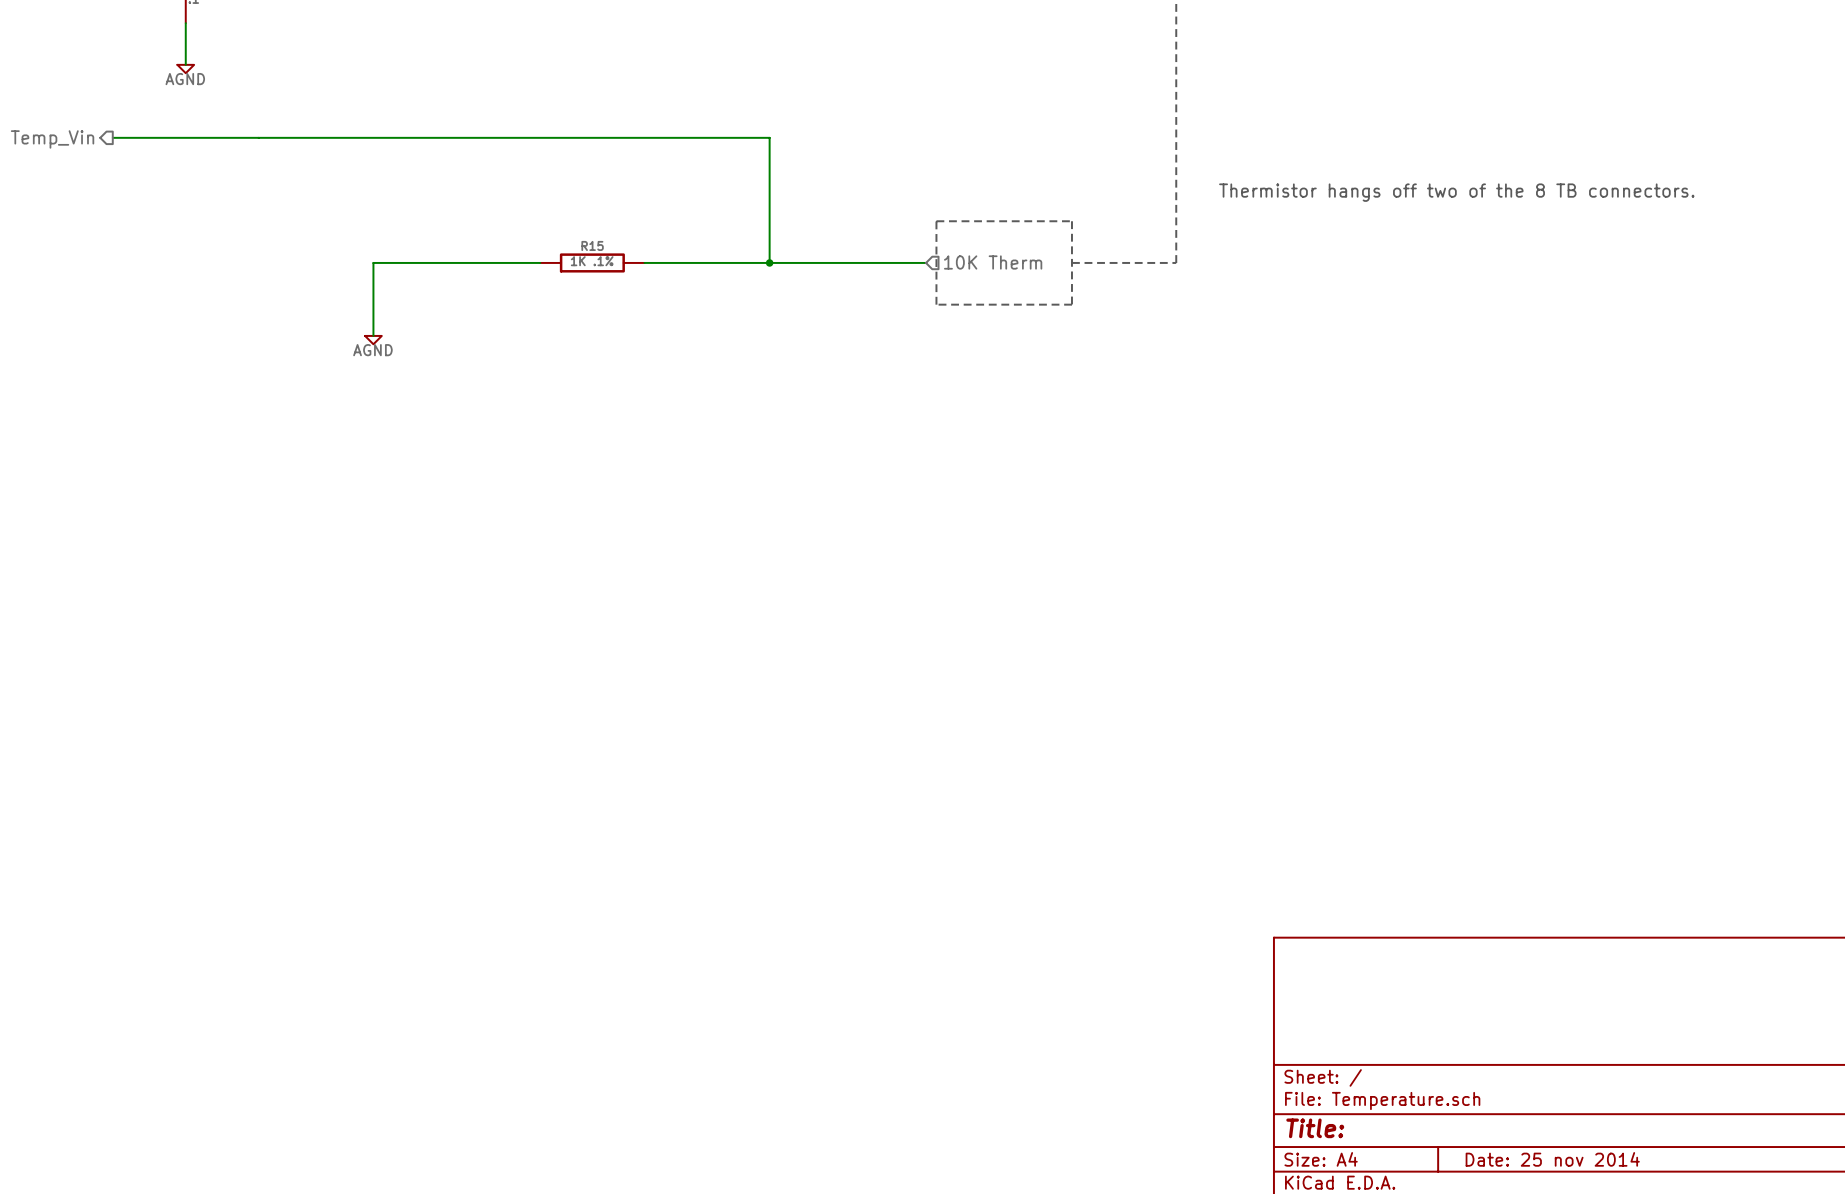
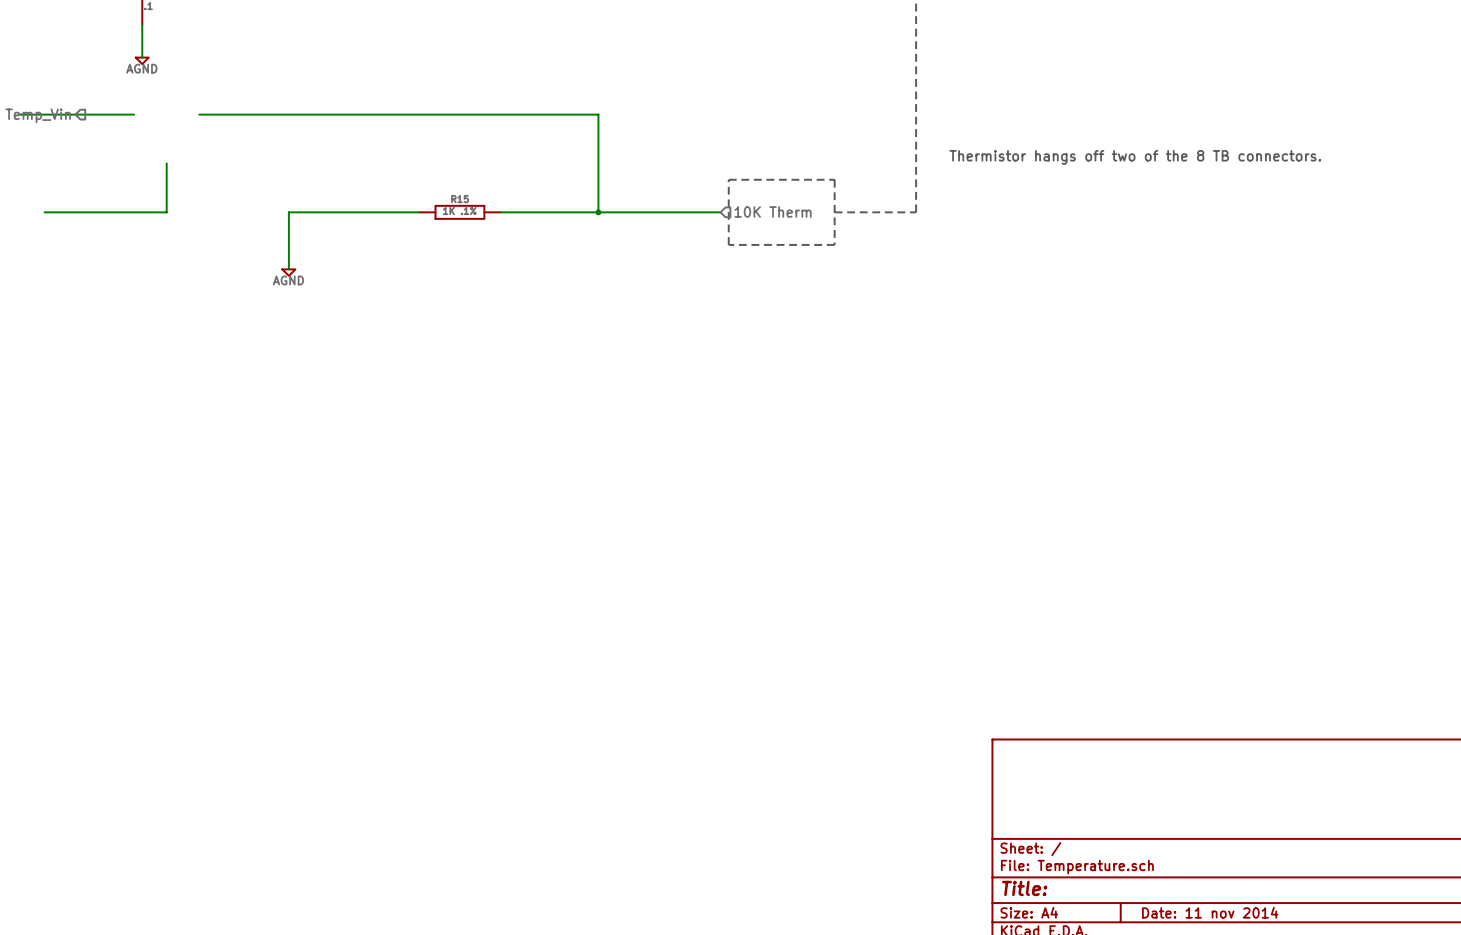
wire: (175, 137) (258, 137) -> (20, 114) (85, 114)
wire: none -> (166, 163) (166, 212) (44, 212)
title block: Date: 25 nov 2014 (1552, 1159) -> Date: 11 nov 2014 (1210, 912)

